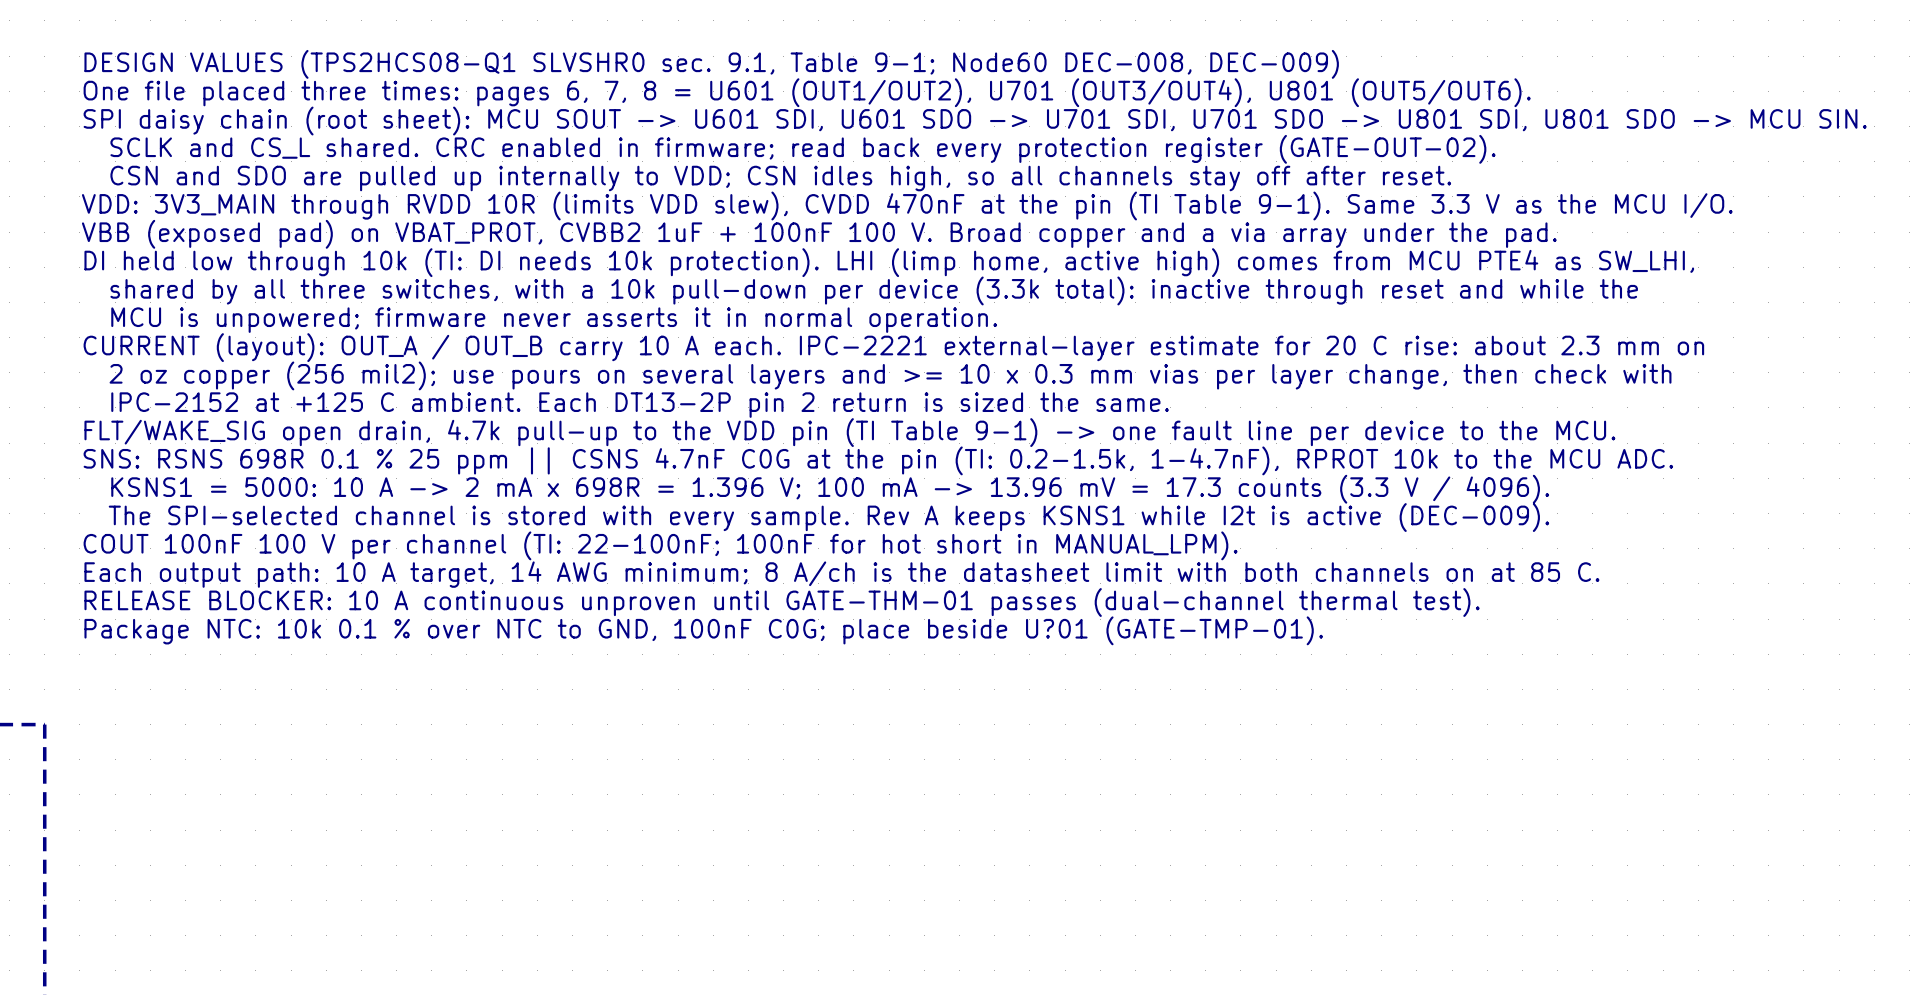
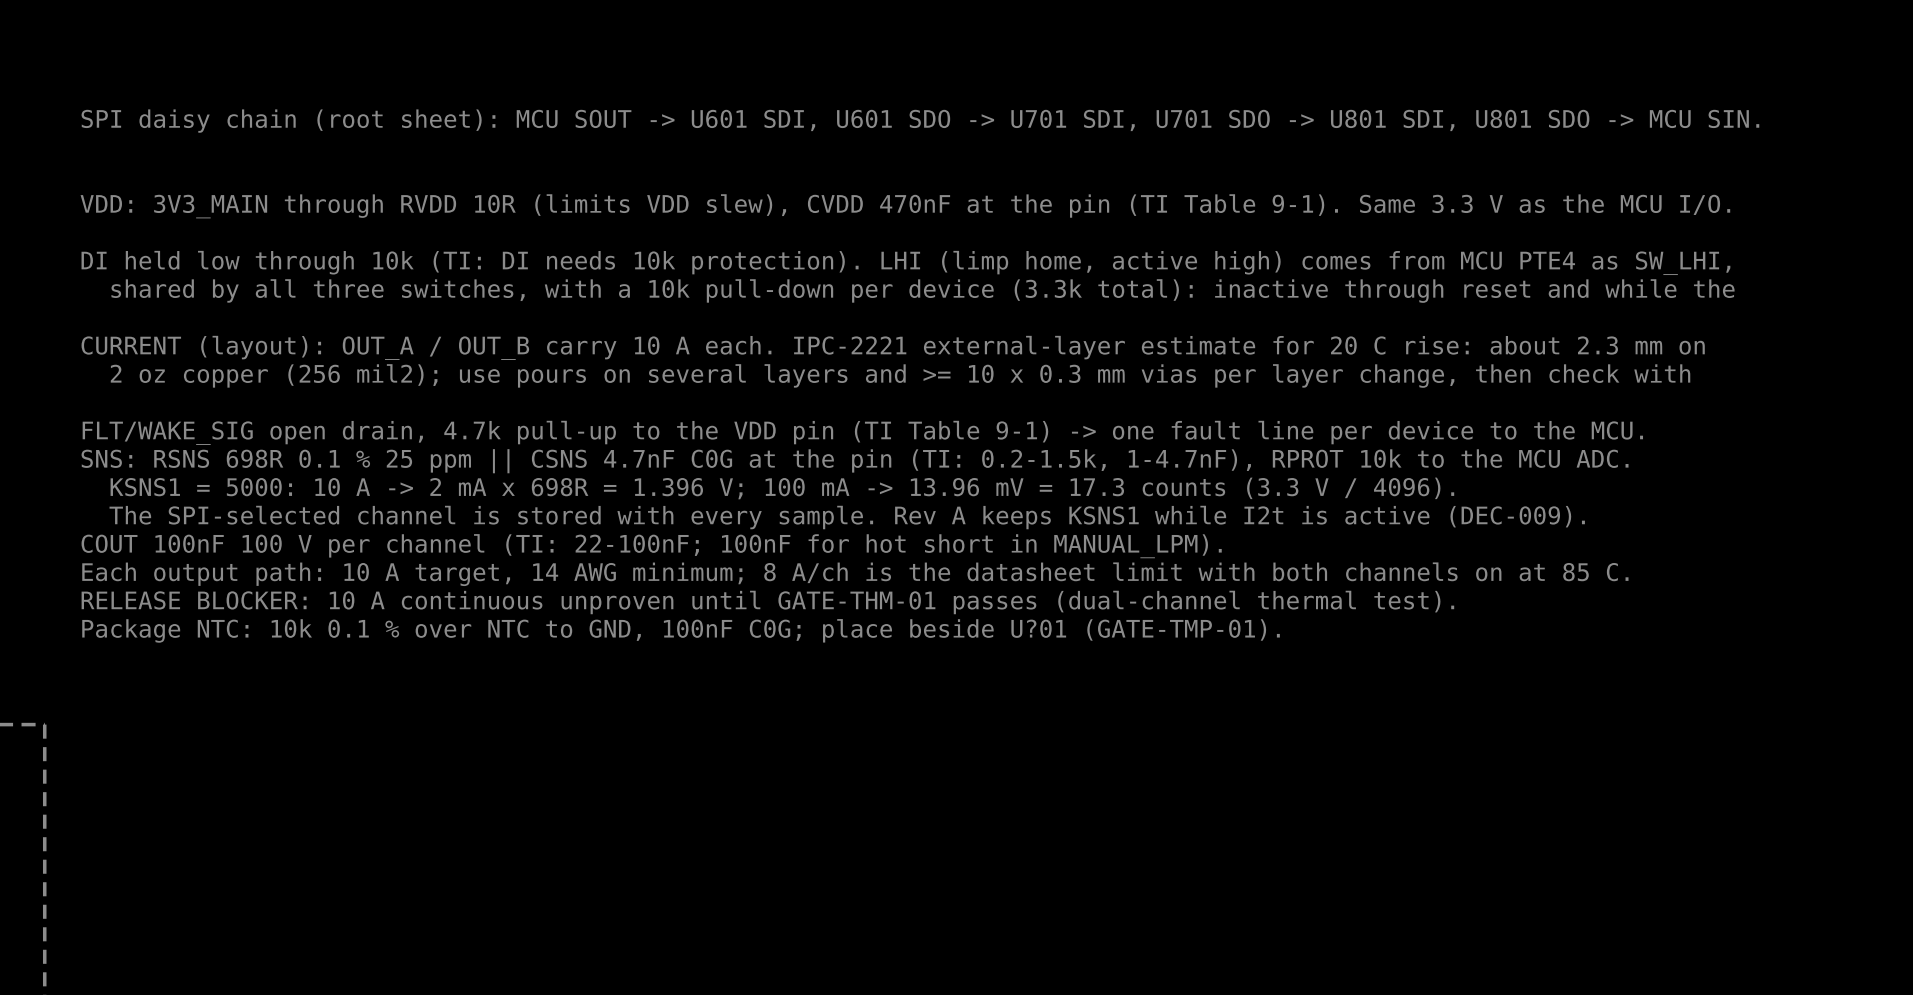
text: DESIGN VALUES (TPS2HCS08-Q1 SLVSHR0 sec. 9.1, Table 9-1; Node60 DEC-008, DEC-009) (711, 64) -> none
text: One file placed three times: pages 6, 7, 8 = U601 (OUT1/OUT2), U701 (OUT3/OUT4), U801 (OUT5/OUT6). (807, 92) -> none
text: SCLK and CS_L shared. CRC enabled in firmware; read back every protection register (GATE-OUT-02). (802, 149) -> none
text: CSN and SDO are pulled up internally to VDD; CSN idles high, so all channels stay off after reset. (780, 178) -> none
text: VBB (exposed pad) on VBAT_PROT, CVBB2 1uF + 100nF 100 V. Broad copper and a via array under the pad. (819, 234) -> none
text: MCU is unpowered; firmware never asserts it in normal operation. (554, 320) -> none
text: IPC-2152 at +125 C ambient. Each DT13-2P pin 2 return is sized the same. (640, 405) -> none

